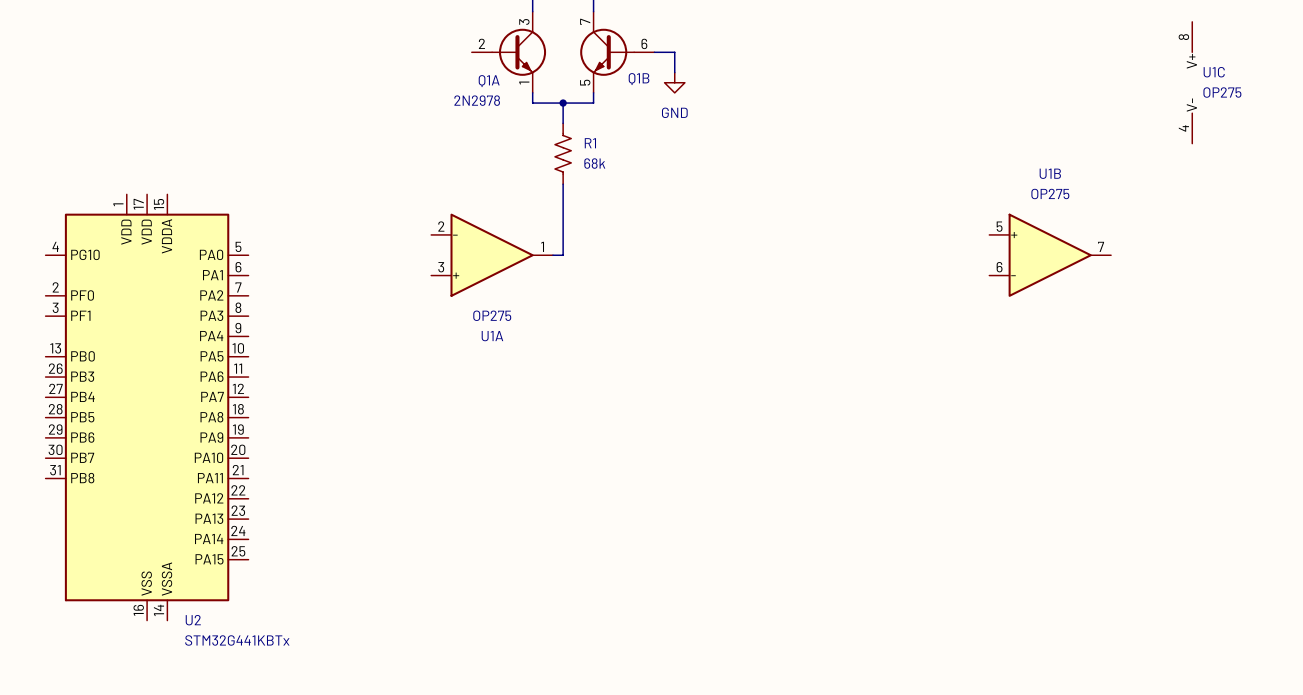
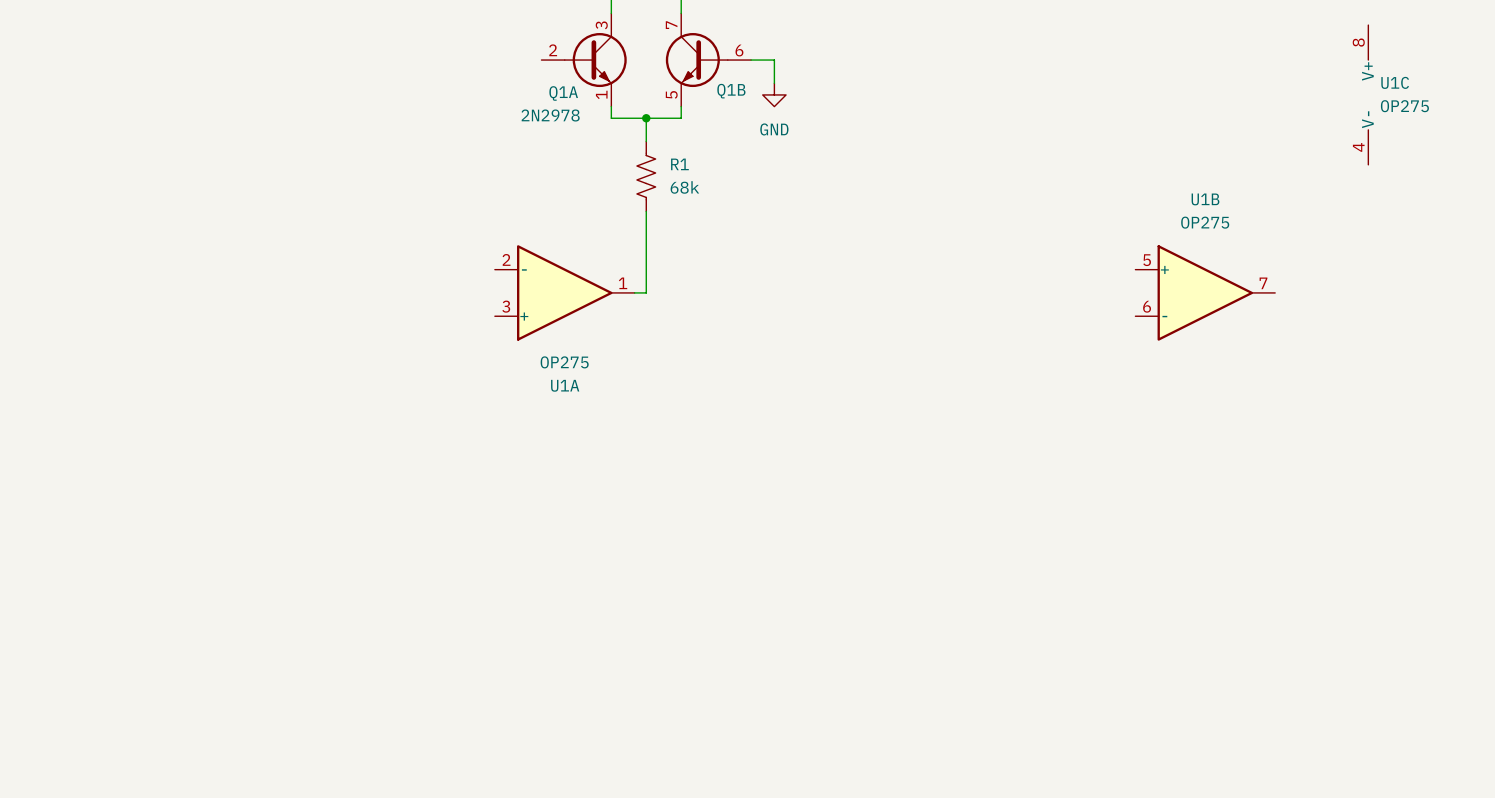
U2: STM32G441KBTx (147, 407) -> none

